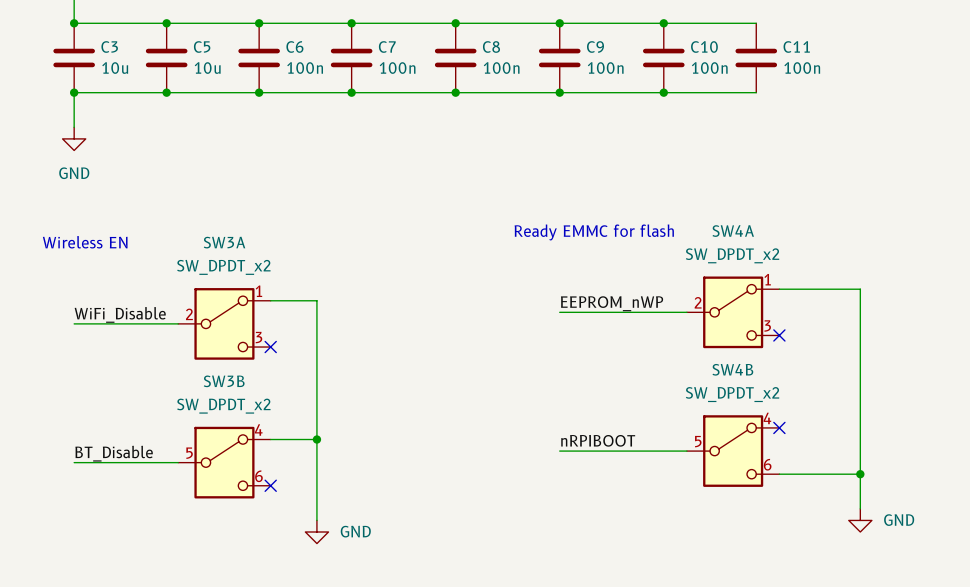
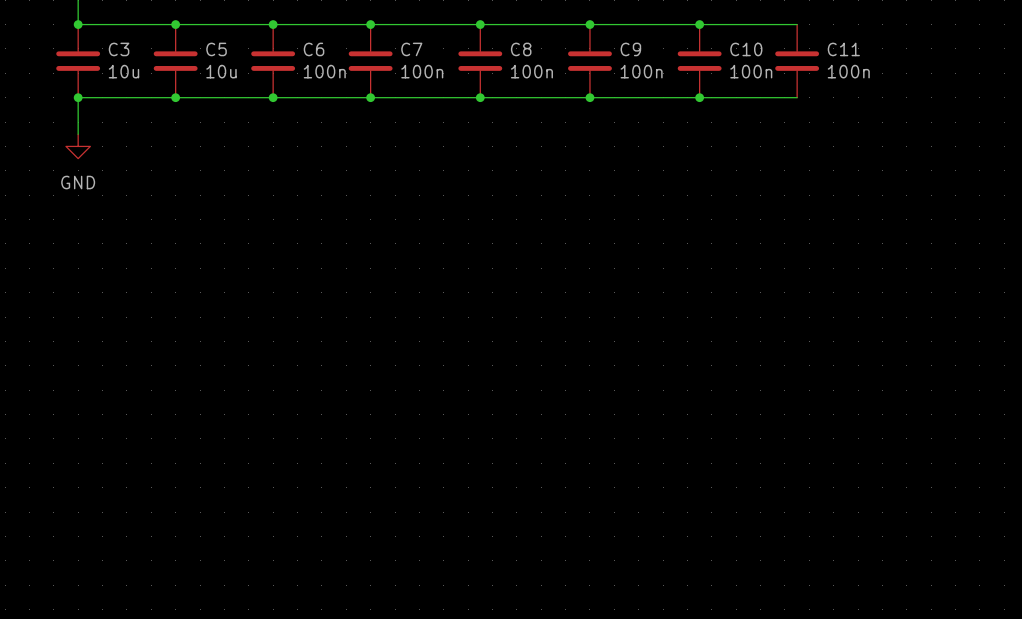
text: Ready EMMC for flash (594, 232) -> none
text: Wireless EN (85, 242) -> none
wire: (779, 289) (860, 289) (860, 508) -> none
wire: (270, 300) (316, 300) (316, 520) -> none
label: EEPROM_nWP (612, 303) -> none
wire: (559, 312) (686, 312) -> none
SW4A: SW_DPDT_x2 (733, 312) -> none
label: WiFi_Disable (120, 314) -> none
wire: (74, 323) (178, 323) -> none
SW3A: SW_DPDT_x2 (224, 323) -> none
no-connect mark: (779, 335) -> none
no-connect mark: (270, 347) -> none
no-connect mark: (779, 427) -> none
wire: (270, 439) (316, 439) -> none
junction: (316, 439) -> none
label: nRPIBOOT (598, 440) -> none
wire: (559, 451) (686, 451) -> none
SW4B: SW_DPDT_x2 (733, 451) -> none
label: BT_Disable (114, 453) -> none
wire: (74, 462) (178, 462) -> none
SW3B: SW_DPDT_x2 (224, 462) -> none
wire: (779, 474) (860, 474) -> none
junction: (860, 474) -> none
no-connect mark: (270, 485) -> none
power symbol: GND (860, 520) -> none
power symbol: GND (316, 532) -> none

